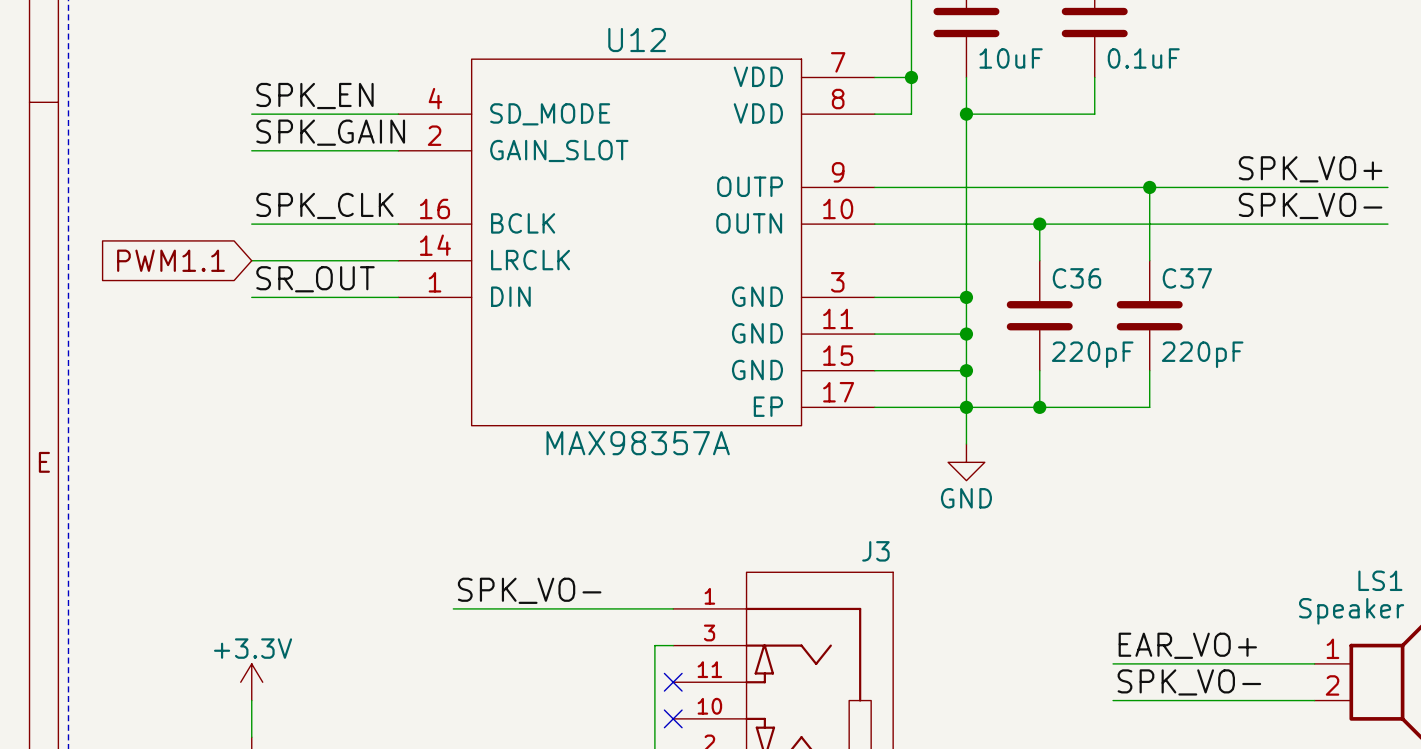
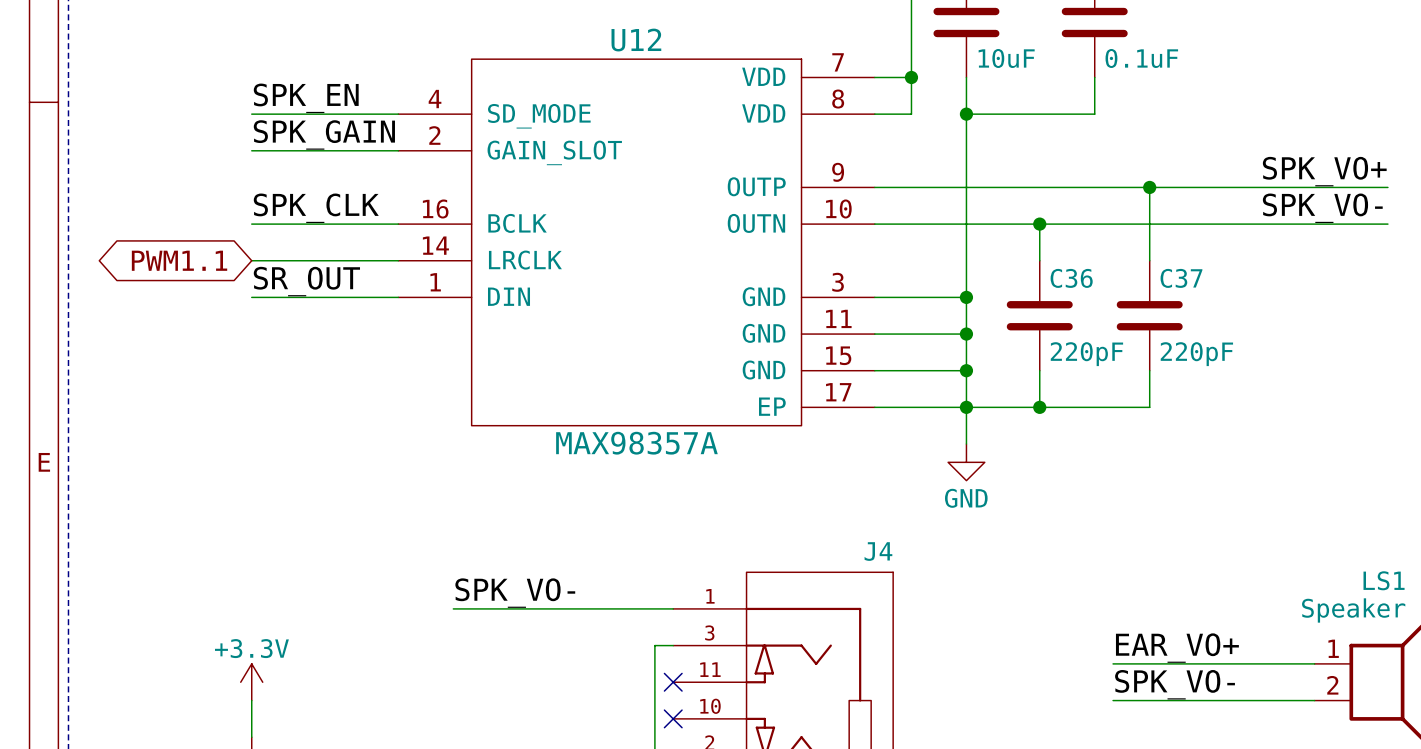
global label shape: input (170, 260) -> bidirectional (179, 260)
J3 name: J3 (875, 551) -> J4 (878, 551)

